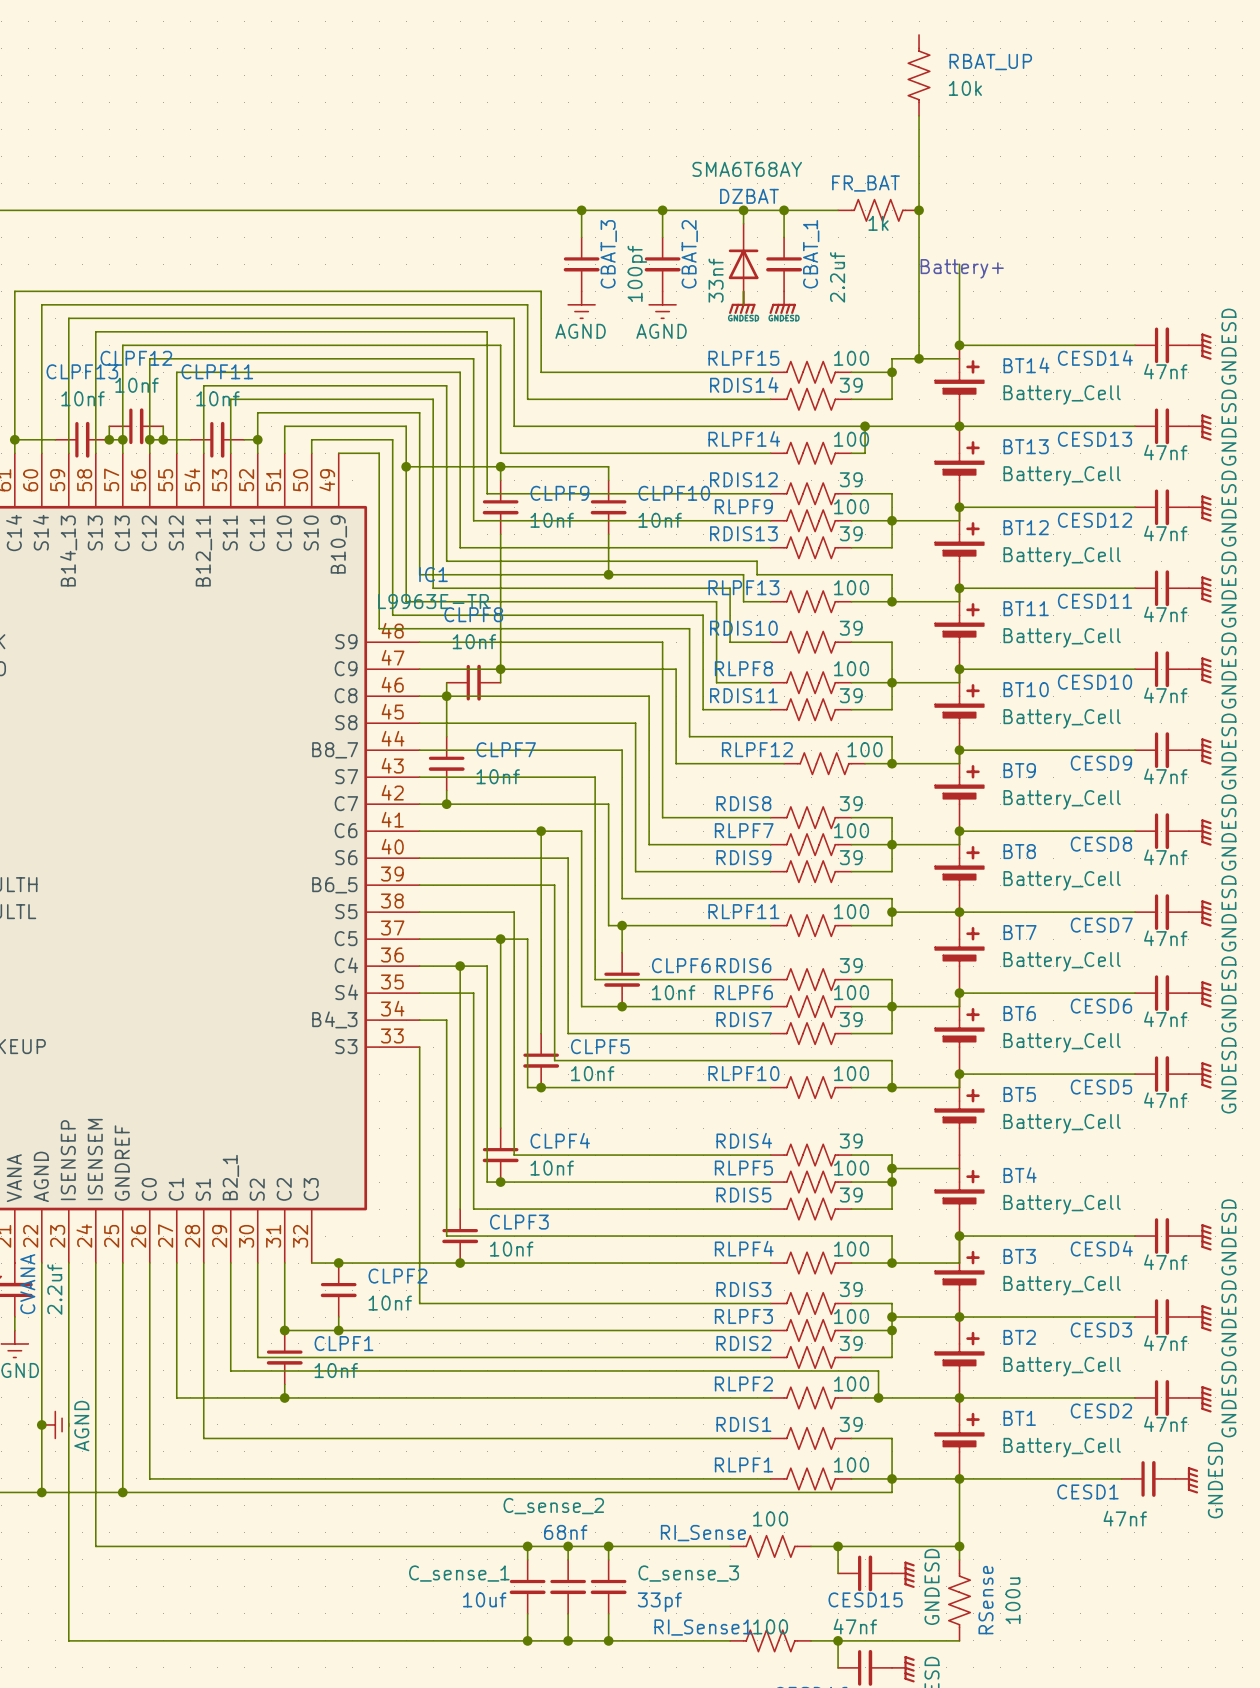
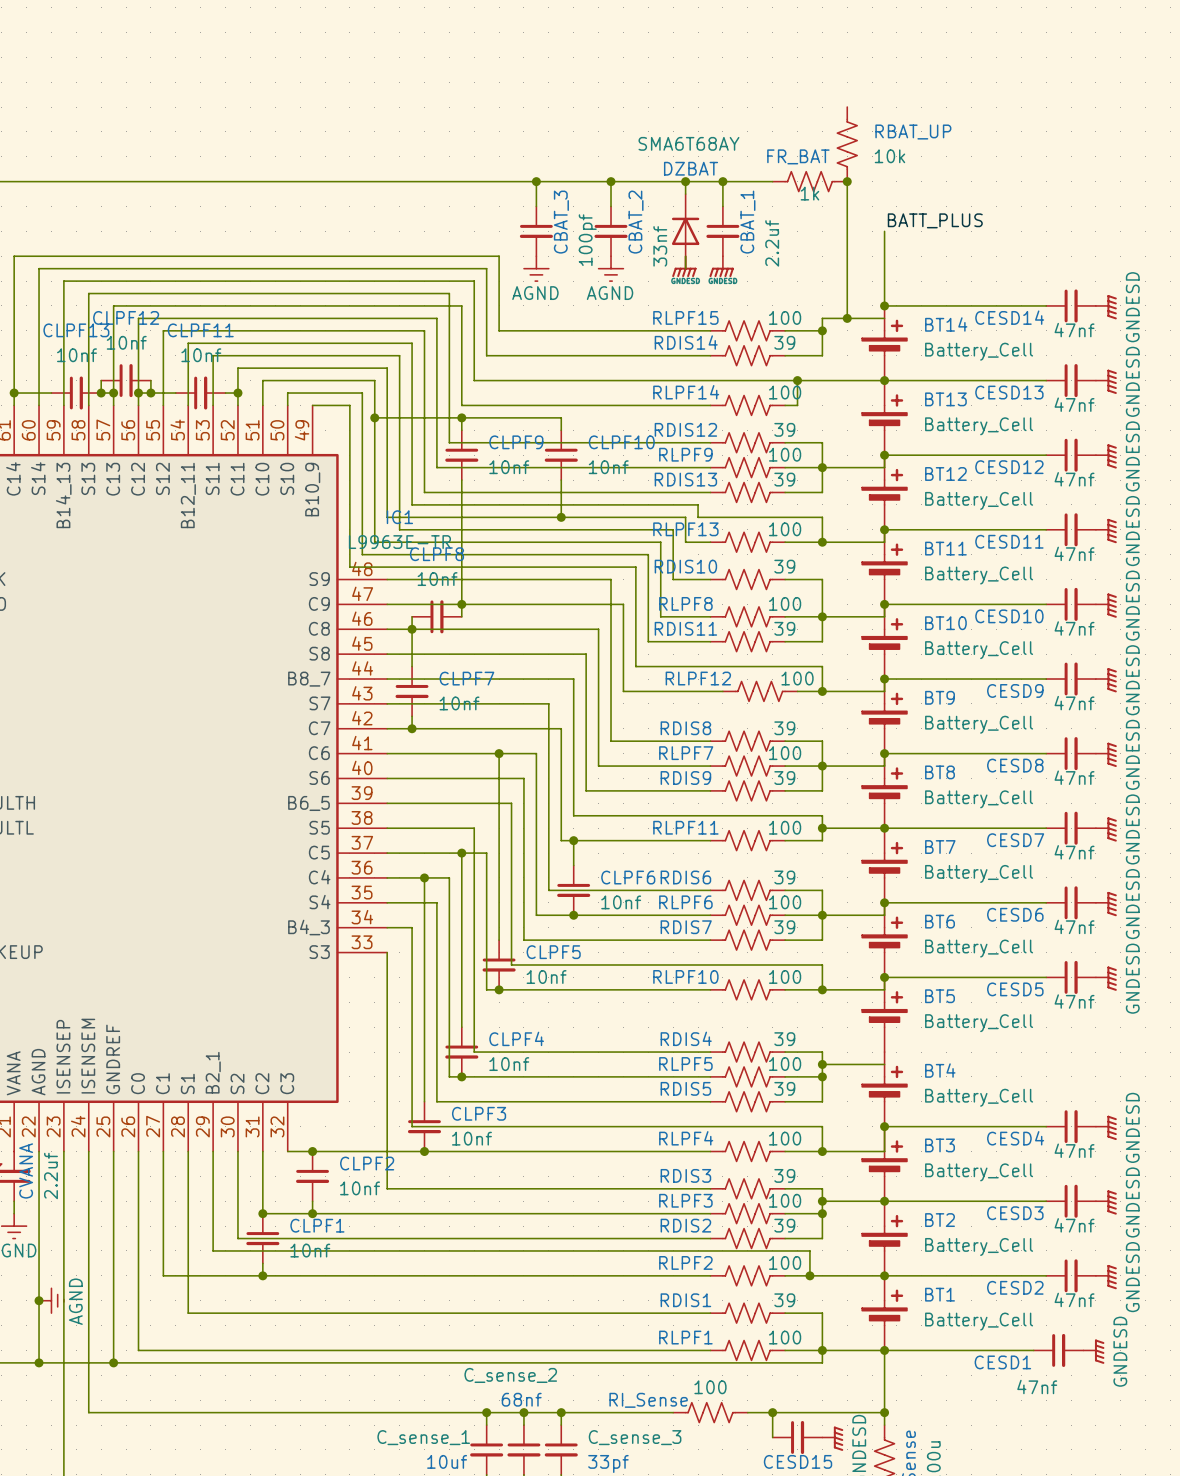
RBAT_UP position: (919, 75) -> (847, 144)
wire: (919, 115) (919, 210) -> none
label: none -> BATT_PLUS (935, 220)
text: Battery+ (962, 268) -> none

